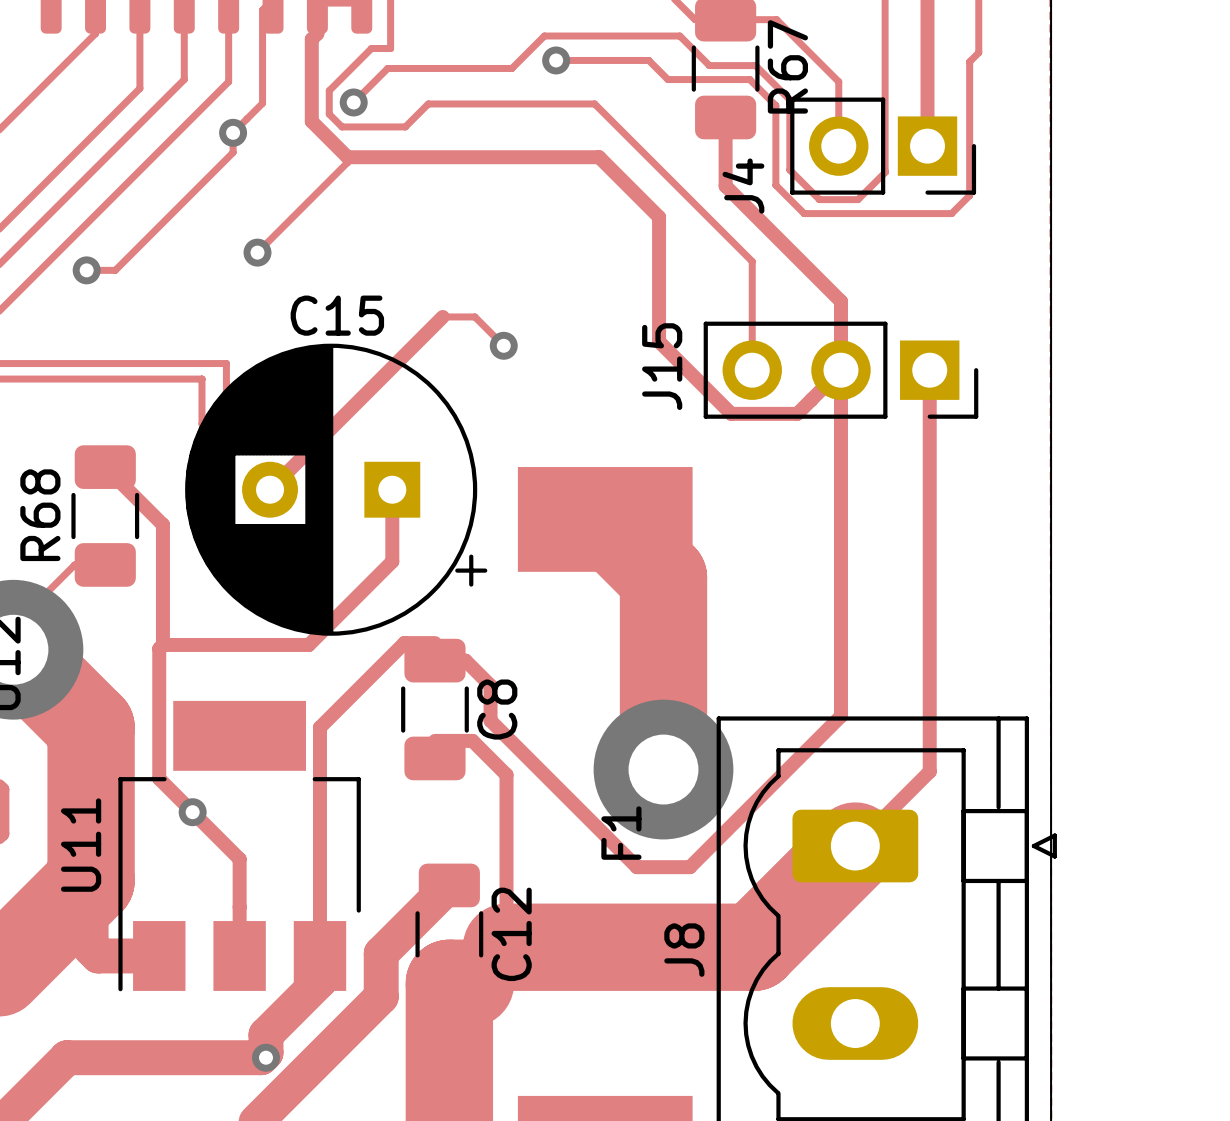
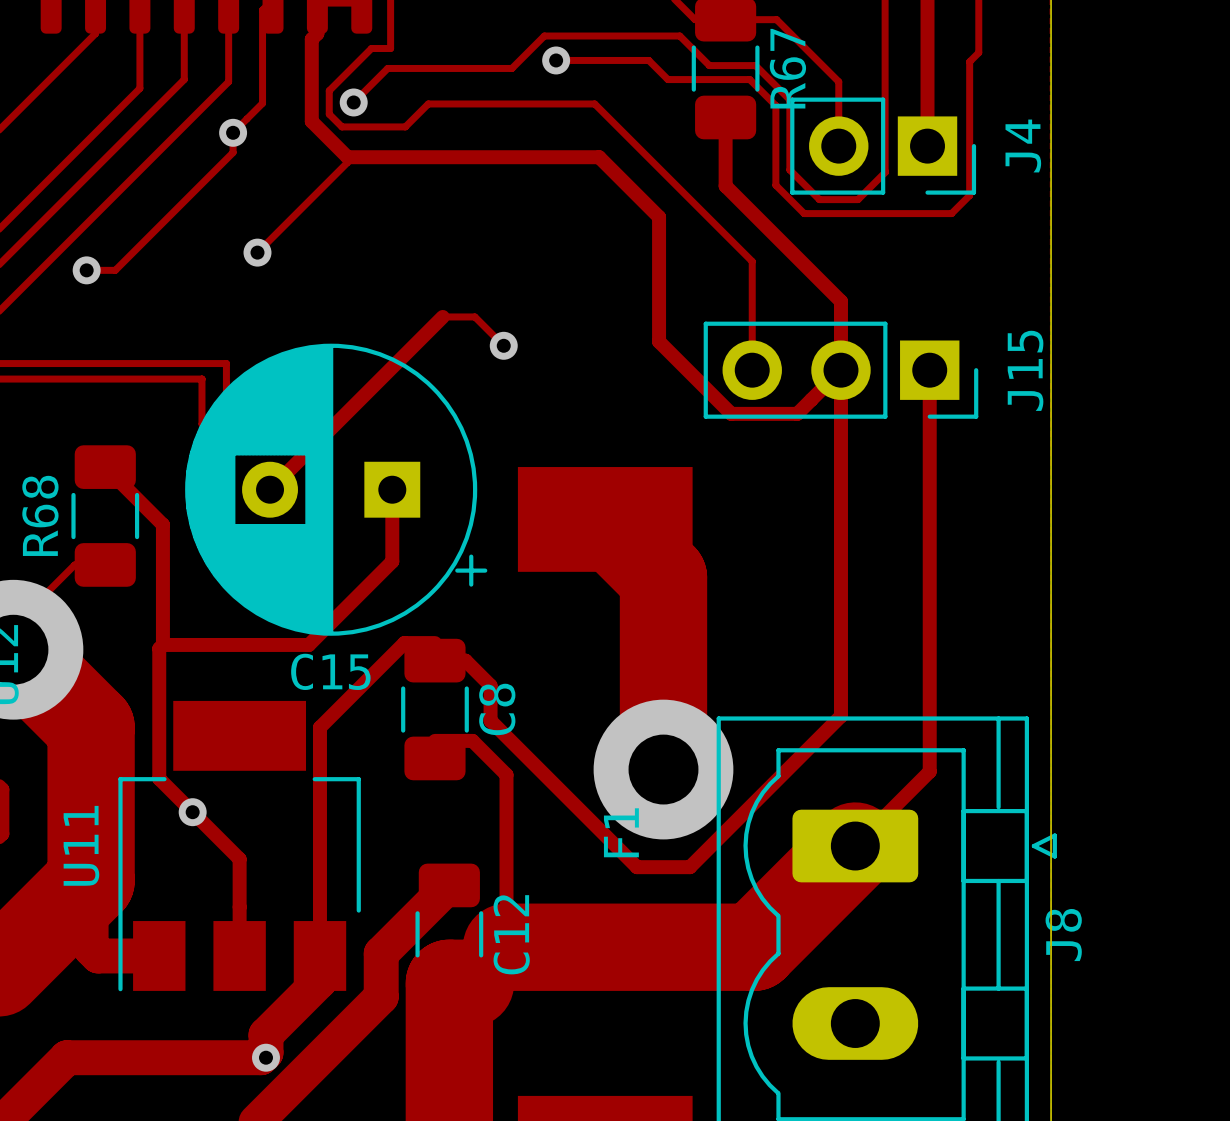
J4 name position: J4 (743, 186) -> J4 (1023, 145)
C15 name position: C15 (337, 315) -> C15 (330, 671)
J15 name position: J15 (662, 366) -> J15 (1025, 370)
J8 name position: J8 (684, 950) -> J8 (1063, 935)

